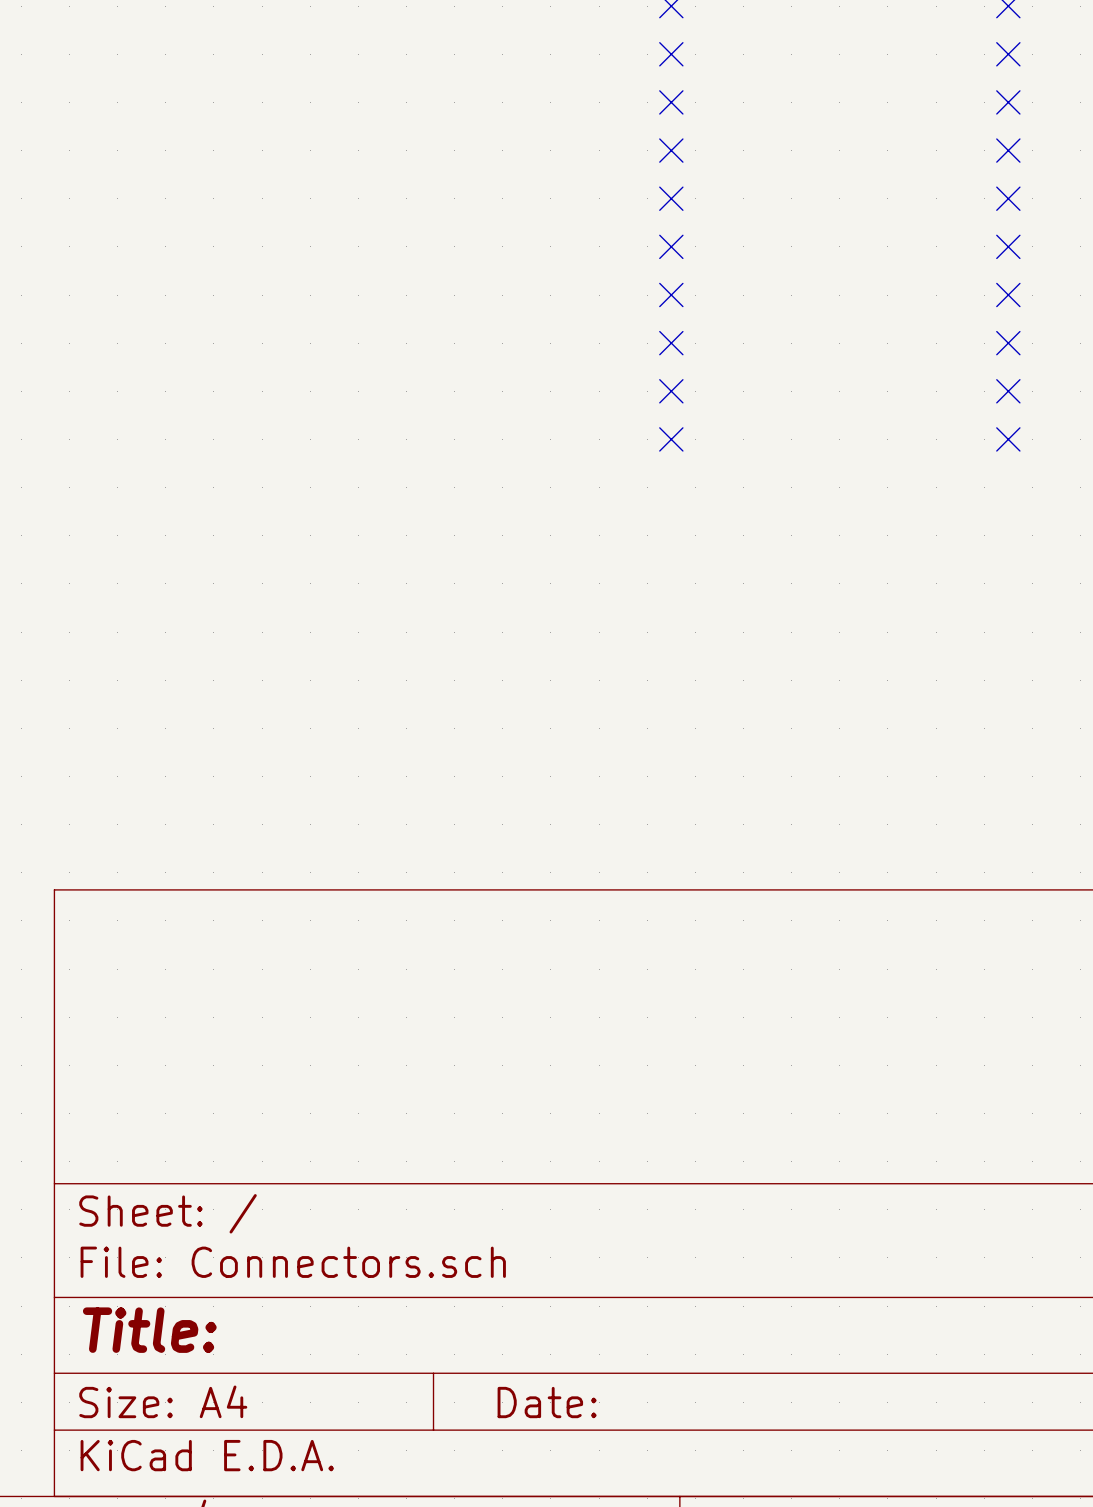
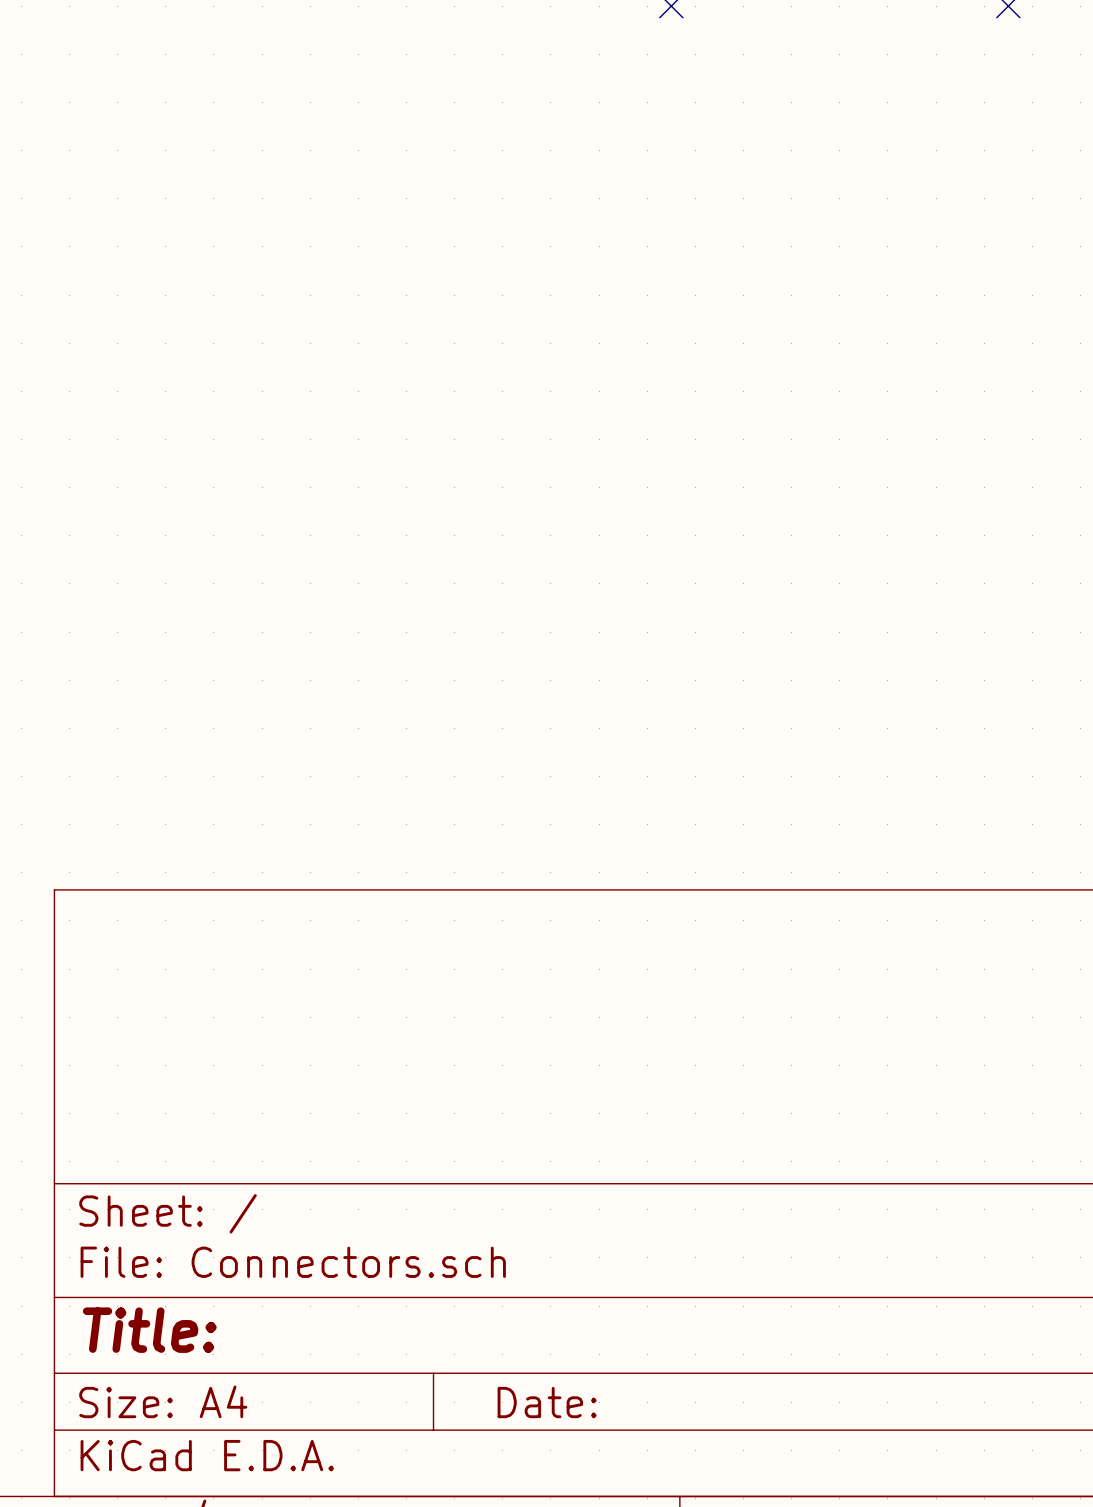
no-connect mark: (671, 54) -> none
no-connect mark: (1008, 54) -> none
no-connect mark: (671, 102) -> none
no-connect mark: (1008, 102) -> none
no-connect mark: (671, 150) -> none
no-connect mark: (1008, 150) -> none
no-connect mark: (671, 198) -> none
no-connect mark: (1008, 198) -> none
no-connect mark: (671, 246) -> none
no-connect mark: (1008, 246) -> none
no-connect mark: (671, 295) -> none
no-connect mark: (1008, 295) -> none
no-connect mark: (671, 343) -> none
no-connect mark: (1008, 343) -> none
no-connect mark: (671, 391) -> none
no-connect mark: (1008, 391) -> none
no-connect mark: (671, 439) -> none
no-connect mark: (1008, 439) -> none

